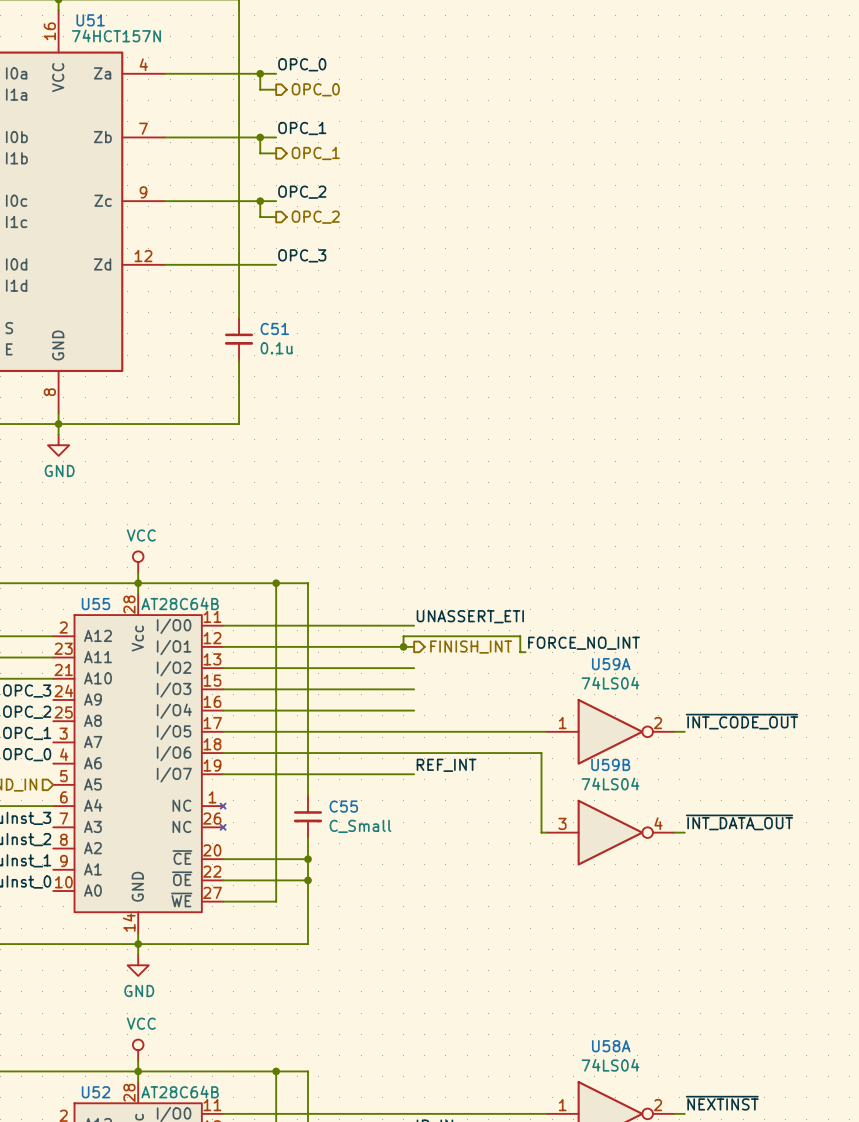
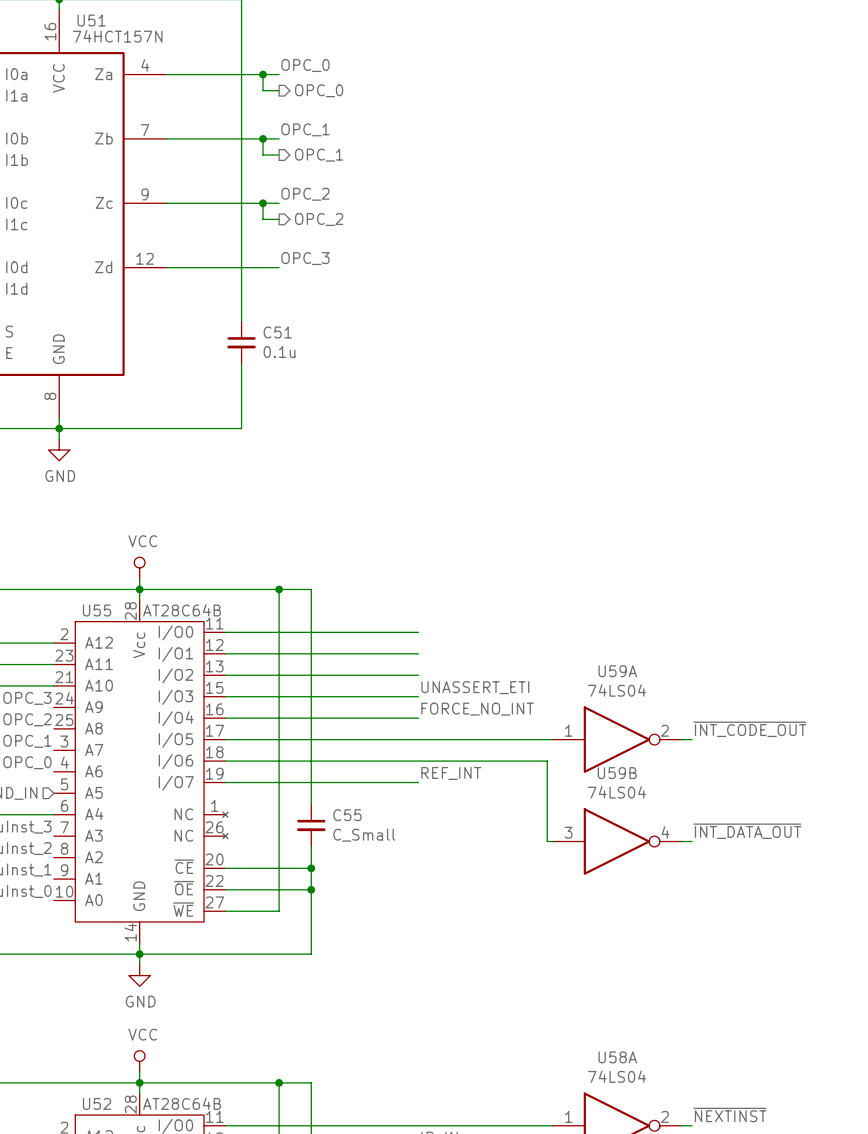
label position: UNASSERT_ETI (470, 616) -> UNASSERT_ETI (475, 687)
label position: FORCE_NO_INT (584, 643) -> FORCE_NO_INT (477, 709)
wire: (403, 646) (403, 636) (520, 636) (520, 652) (525, 652) -> none
junction: (403, 646) -> none
hierarchical label: FINISH_INT (471, 647) -> none

